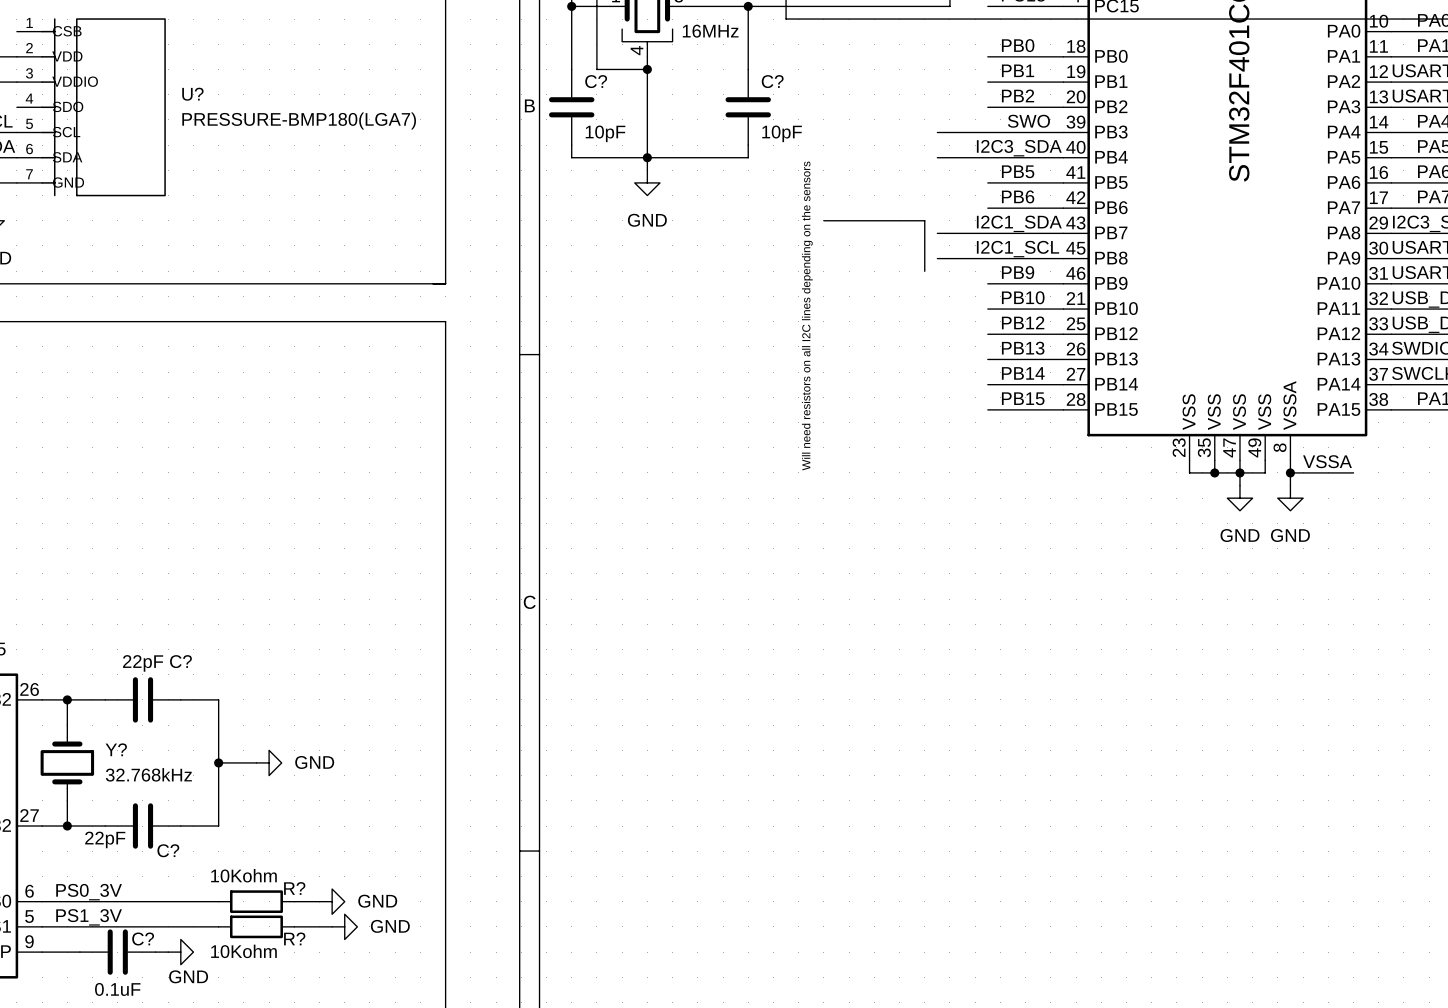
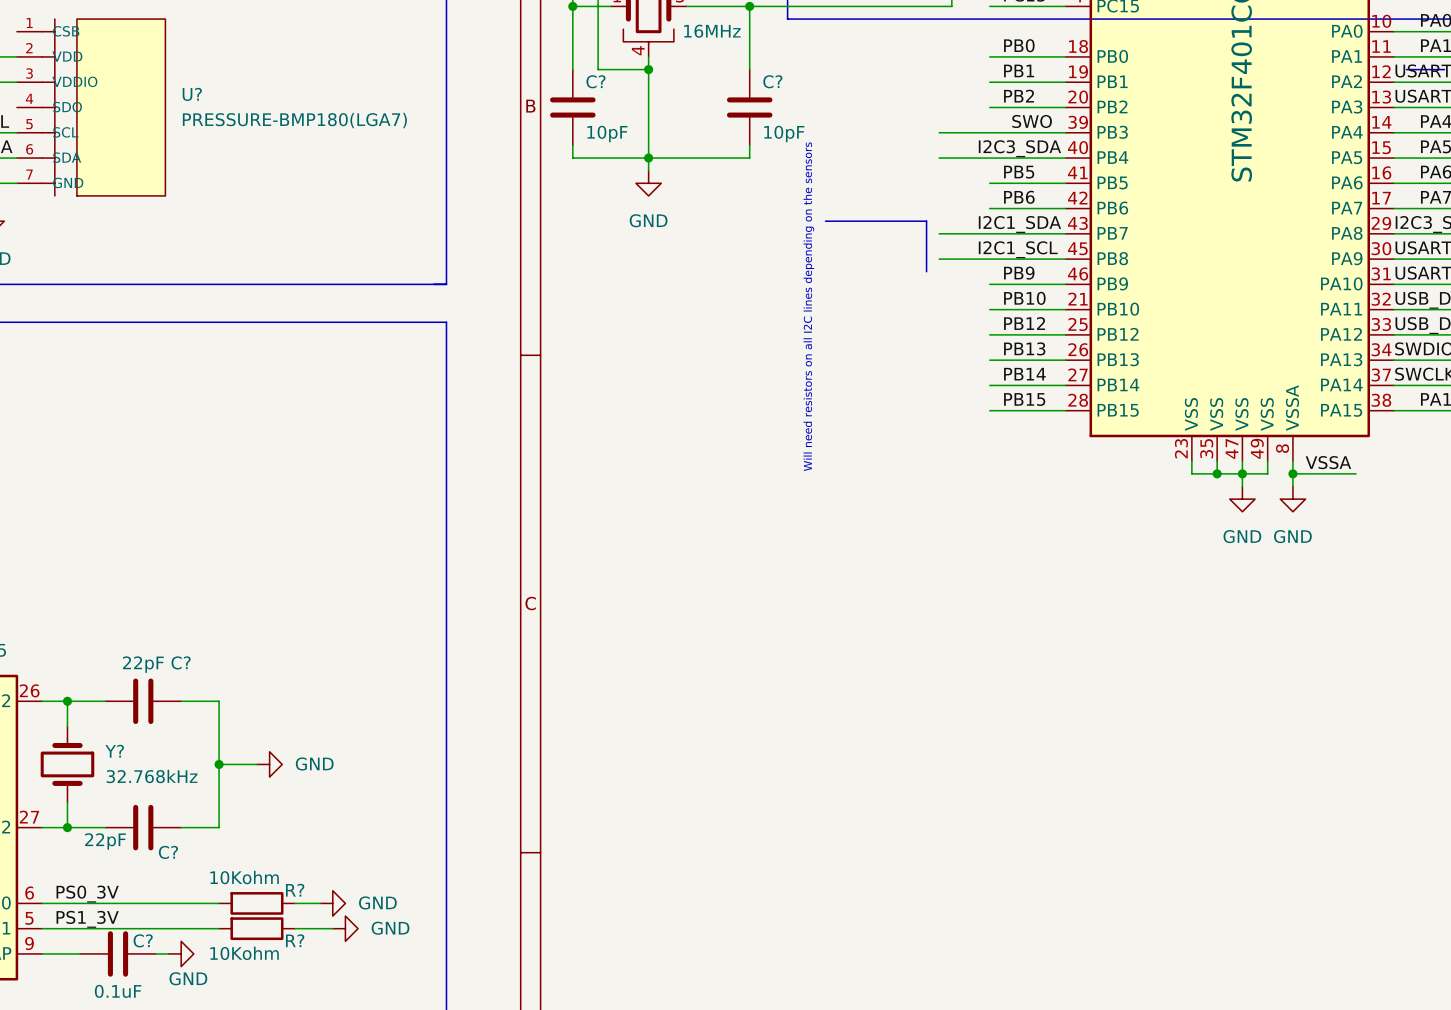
line: none -> (1406, 69) (1444, 69)

